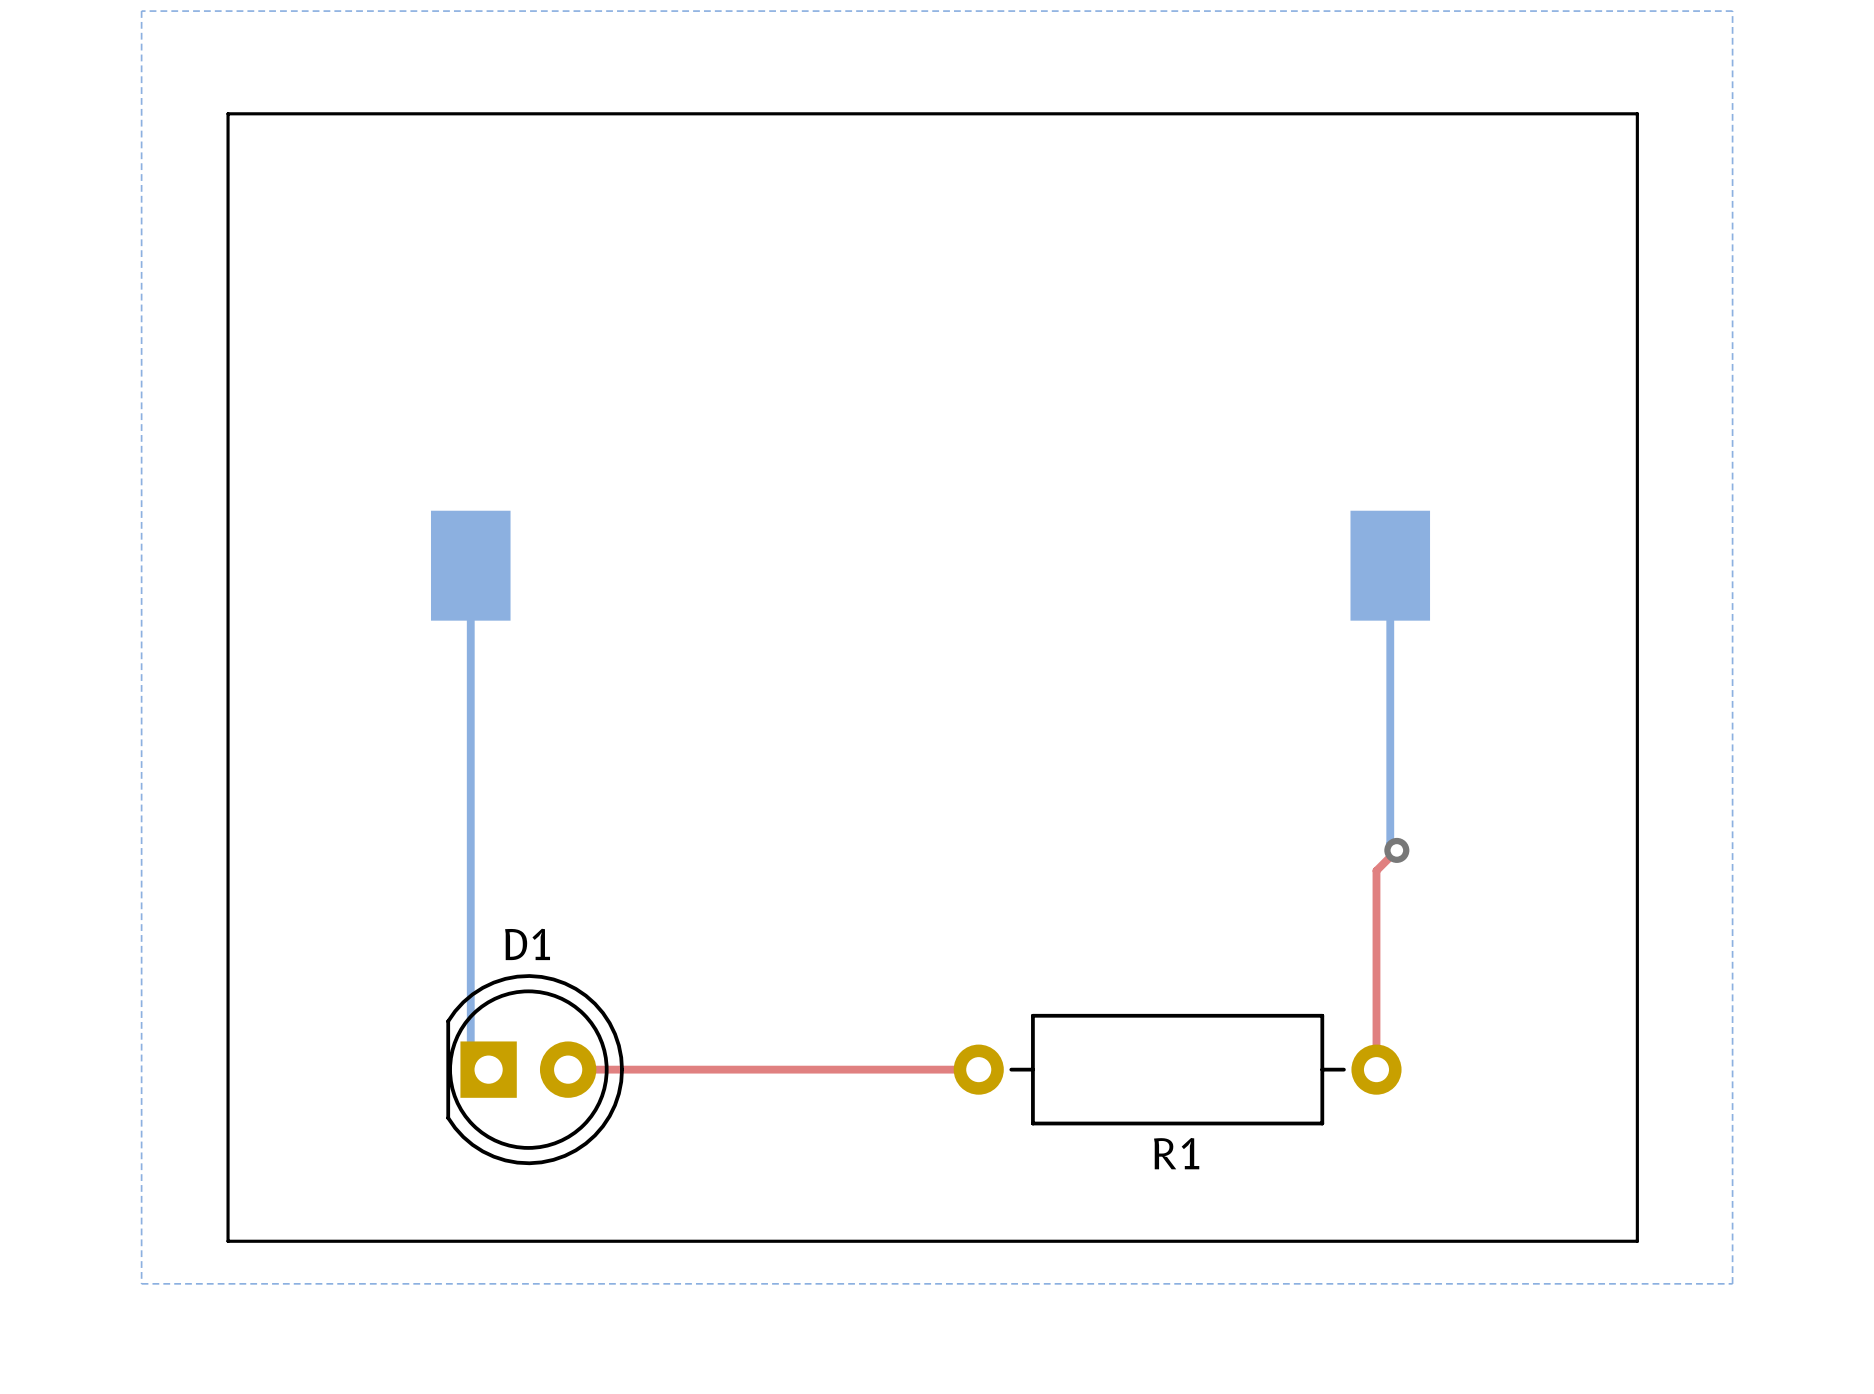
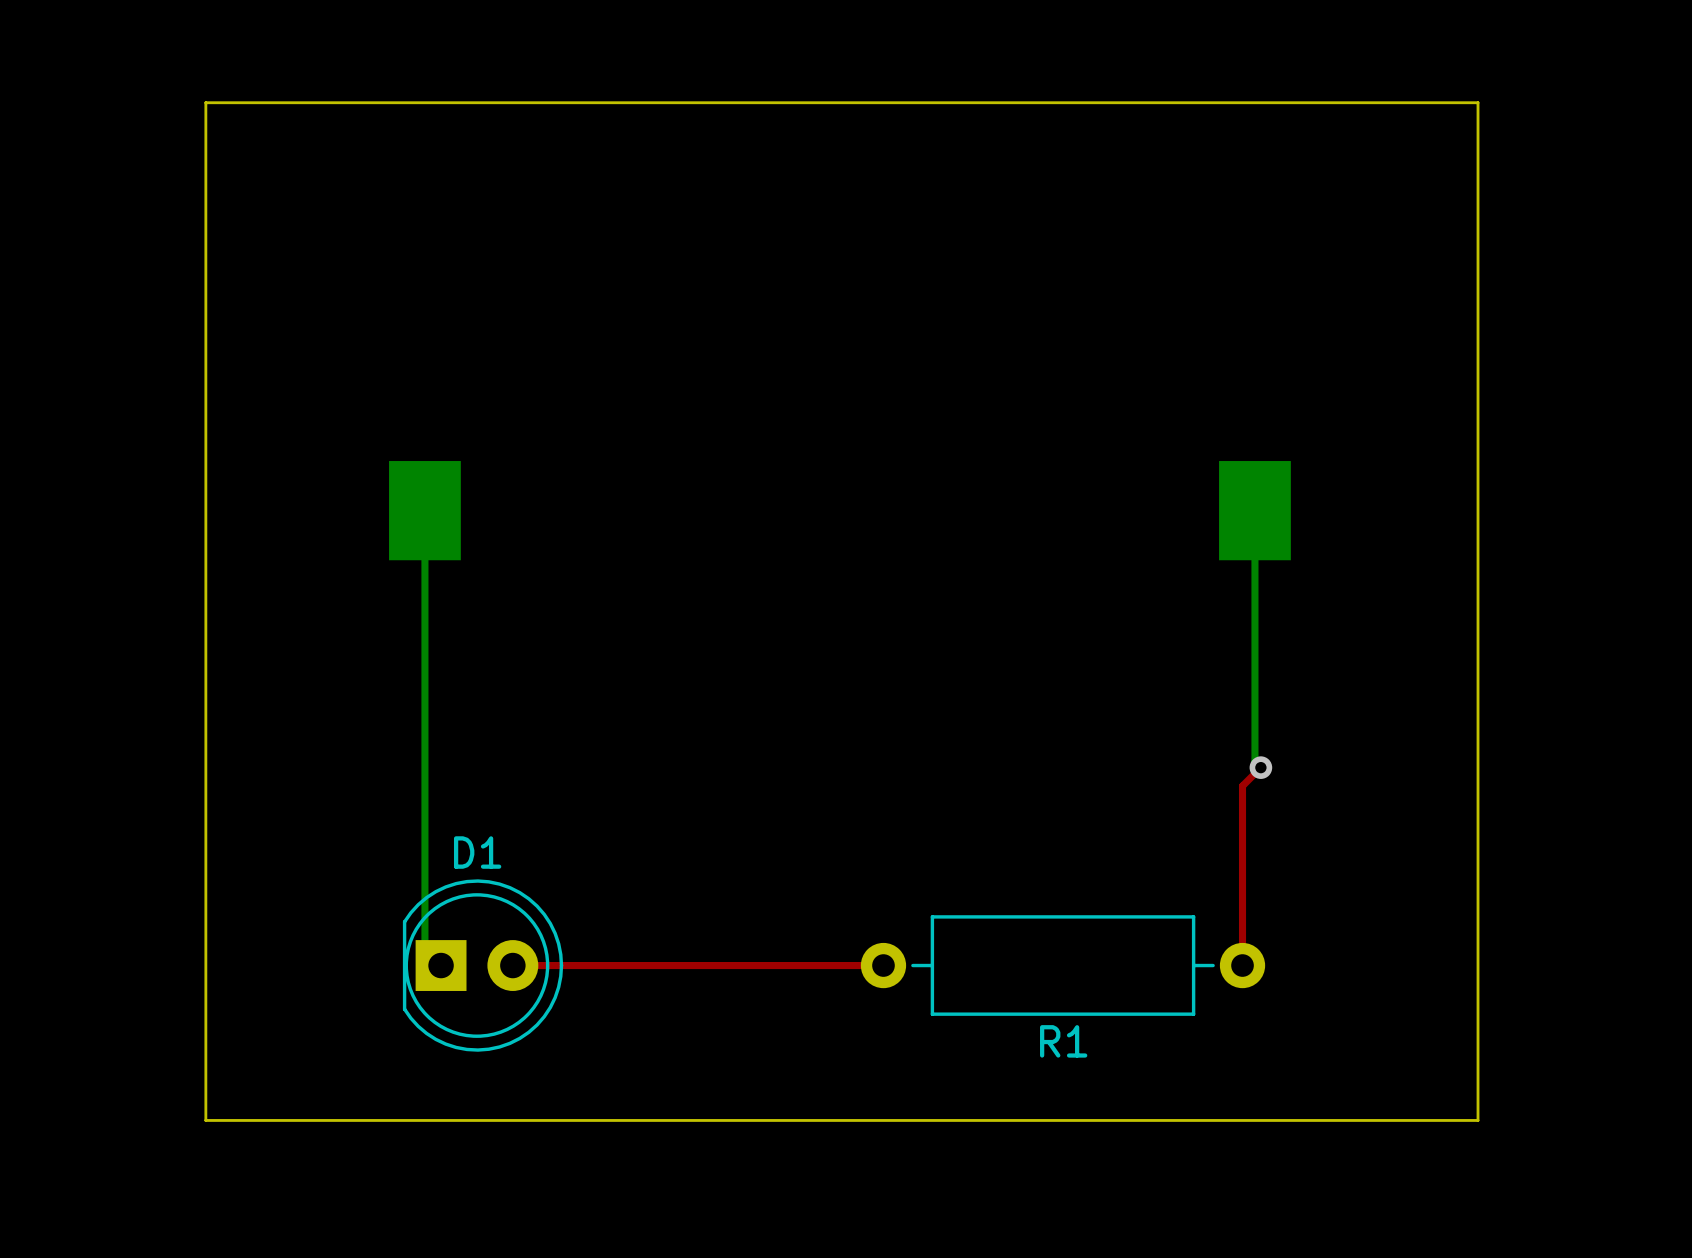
bottom zone outline: (141, 11) (141, 1283) (1732, 1283) (1732, 11) (141, 11) -> none

